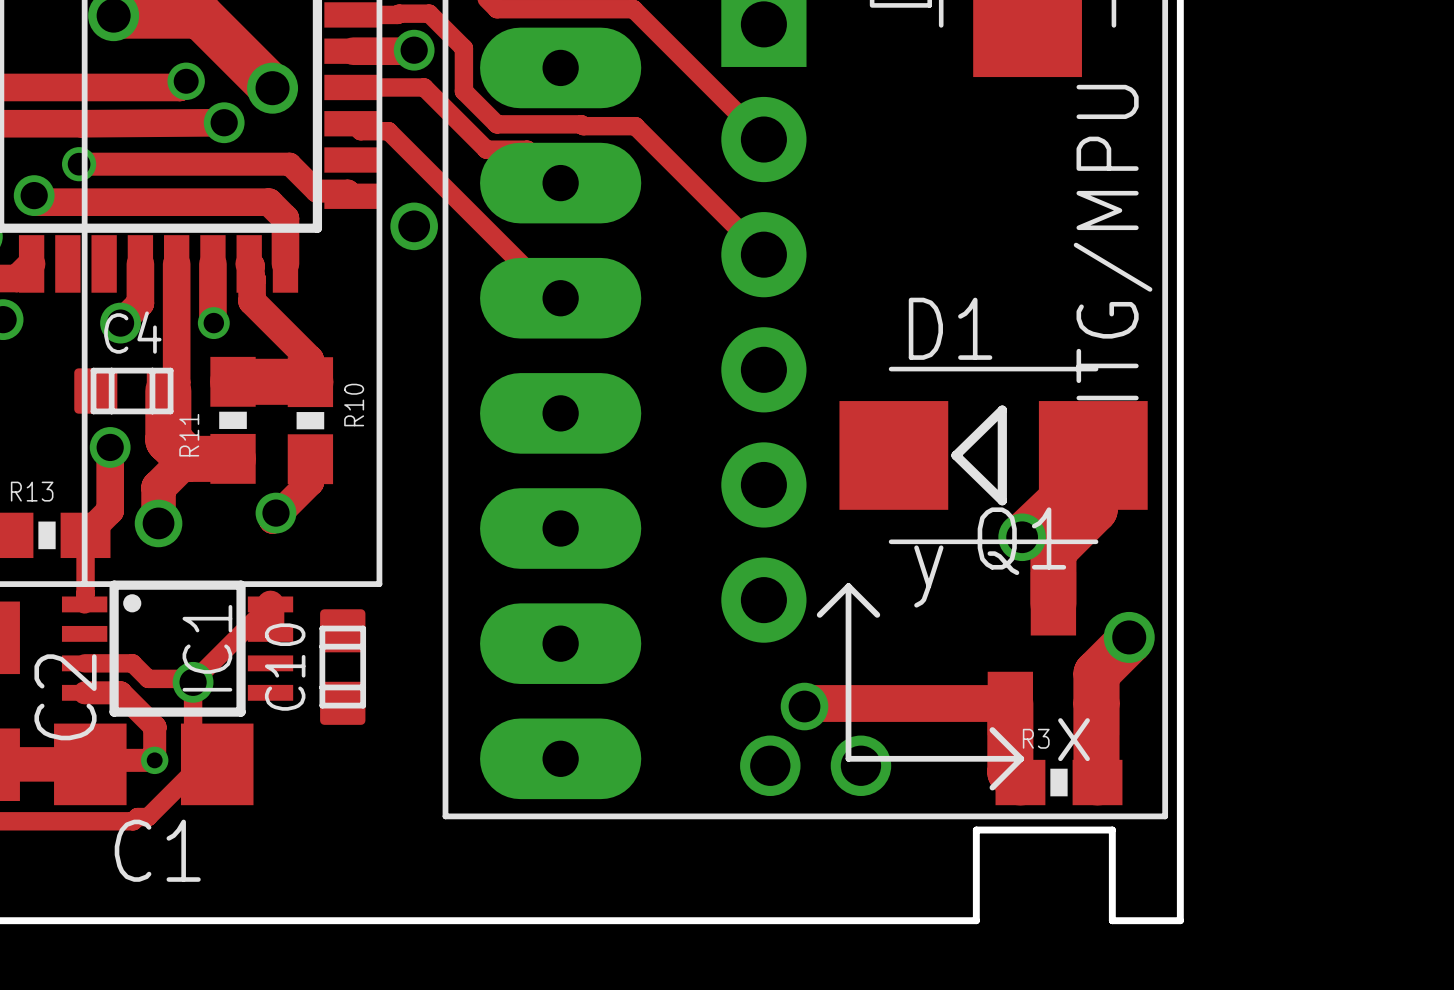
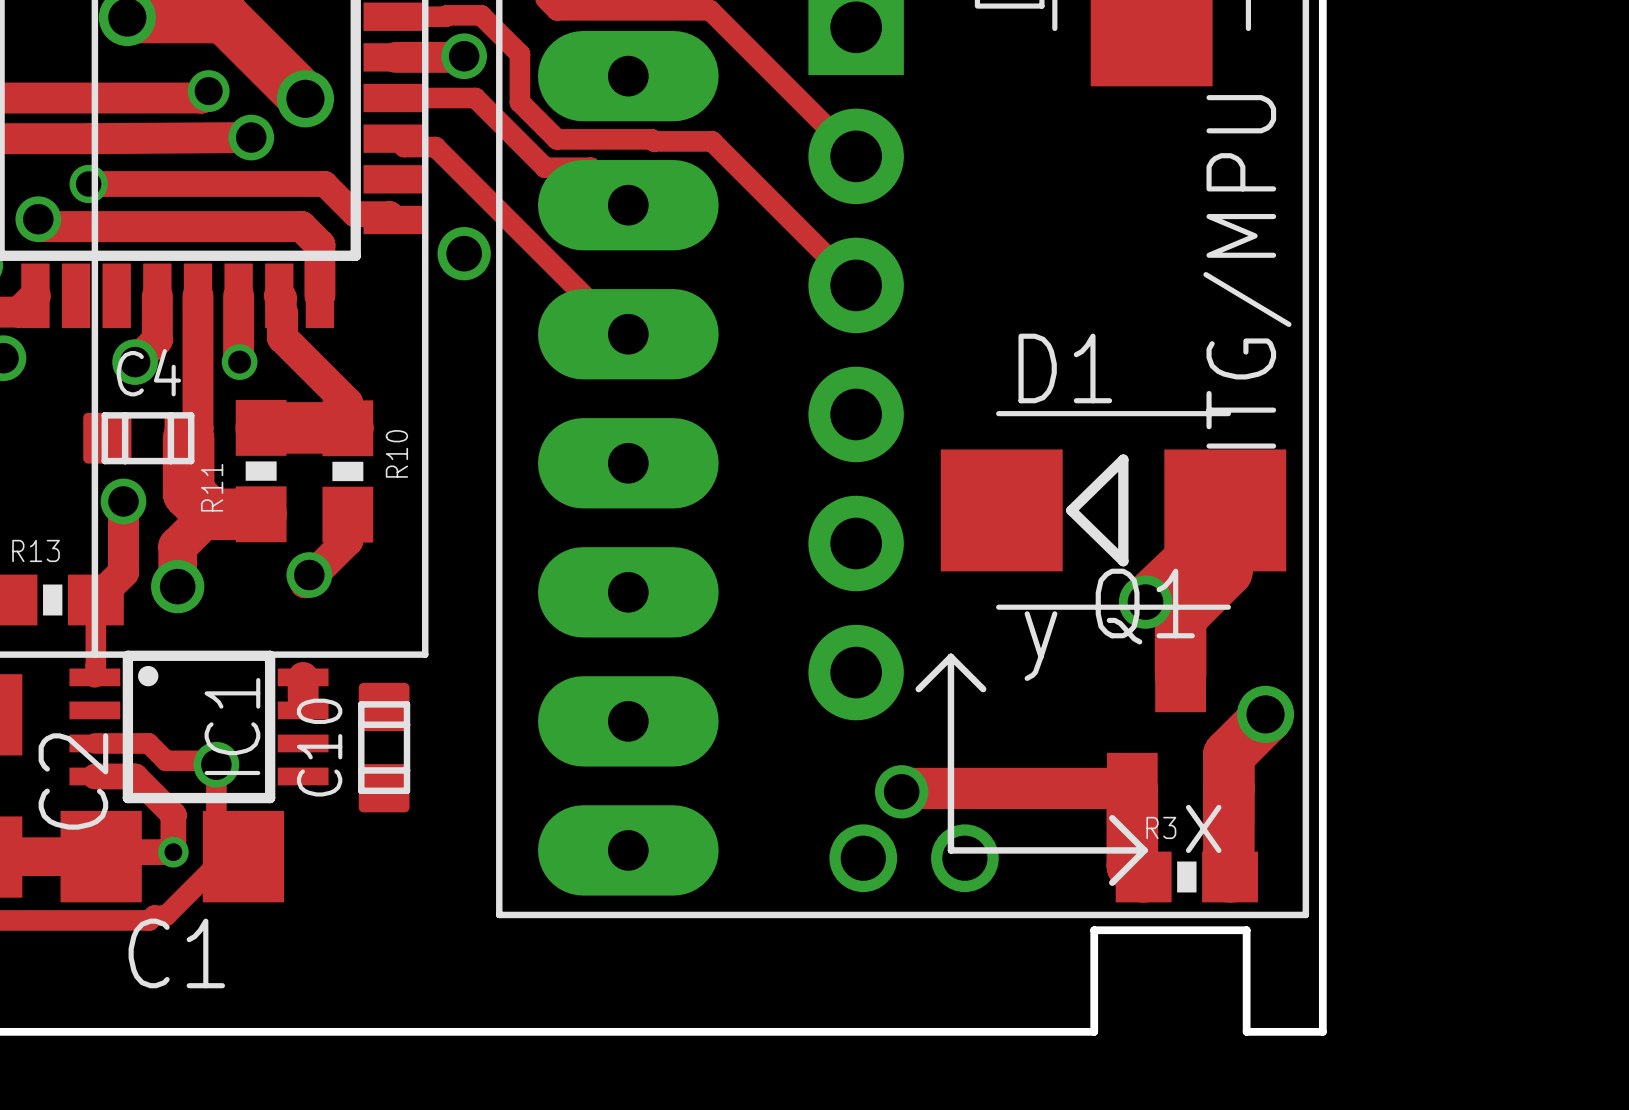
track: (270, 604) (193, 681) -> none

